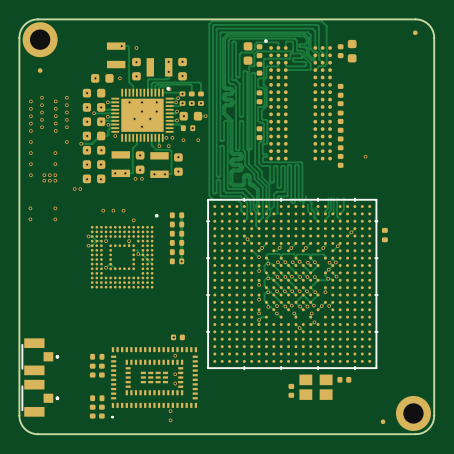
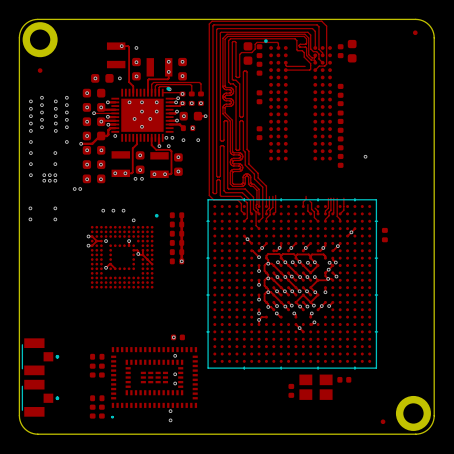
track: (285, 47) (286, 41) (293, 42) (292, 51) (256, 51) (254, 53) (254, 65) (249, 67) (249, 148) (251, 148) (251, 73) (254, 72) (255, 164) (261, 171) (261, 177) (269, 184) (269, 196) -> none
track: (278, 62) (277, 66) (266, 67) (266, 77) (263, 80) (263, 84) (266, 87) (266, 105) (261, 110) (261, 118) (267, 120) (267, 142) (262, 144) (262, 153) (267, 155) (263, 157) (262, 161) (301, 162) (302, 199) (298, 200) (298, 165) (295, 165) (295, 201) (291, 201) (291, 165) (288, 165) (287, 195) (277, 197) (277, 212) (273, 213) -> (275, 195) (275, 212) (273, 213)
track: (305, 66) (305, 61) (293, 60) (294, 58) (301, 58) (300, 53) (291, 53) (289, 58) (264, 58) (263, 77) (258, 79) (258, 86) (264, 89) (264, 105) (258, 107) (258, 120) (263, 123) (263, 140) (259, 142) (259, 163) (261, 165) (270, 166) (271, 182) (273, 181) (273, 166) (277, 166) (278, 188) (281, 187) (281, 166) (284, 166) (284, 190) (276, 191) (273, 194) (272, 207) -> (272, 196) (272, 207)

